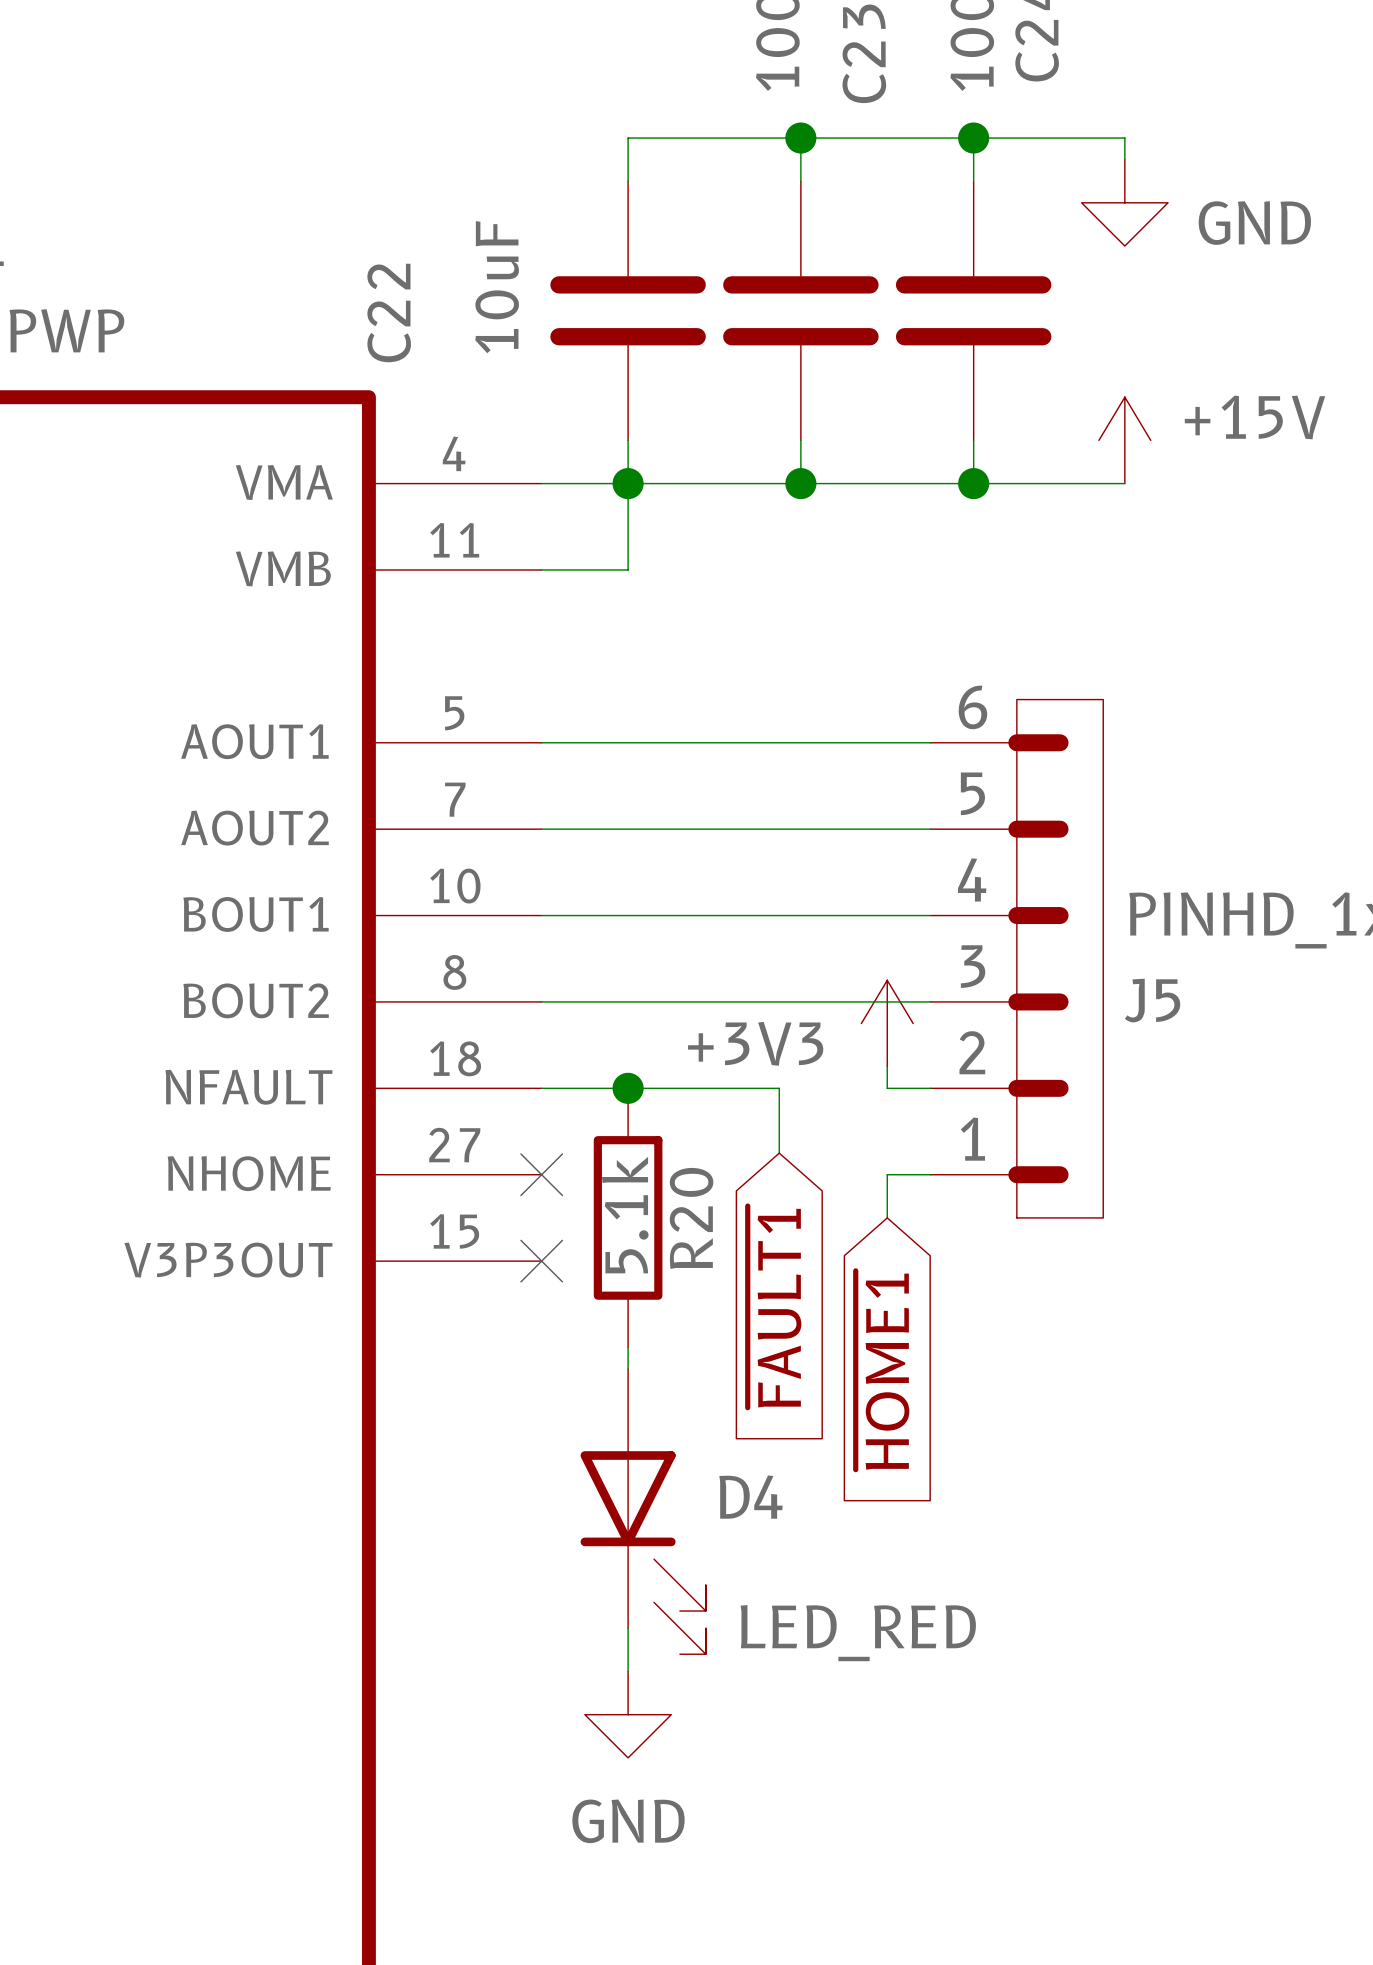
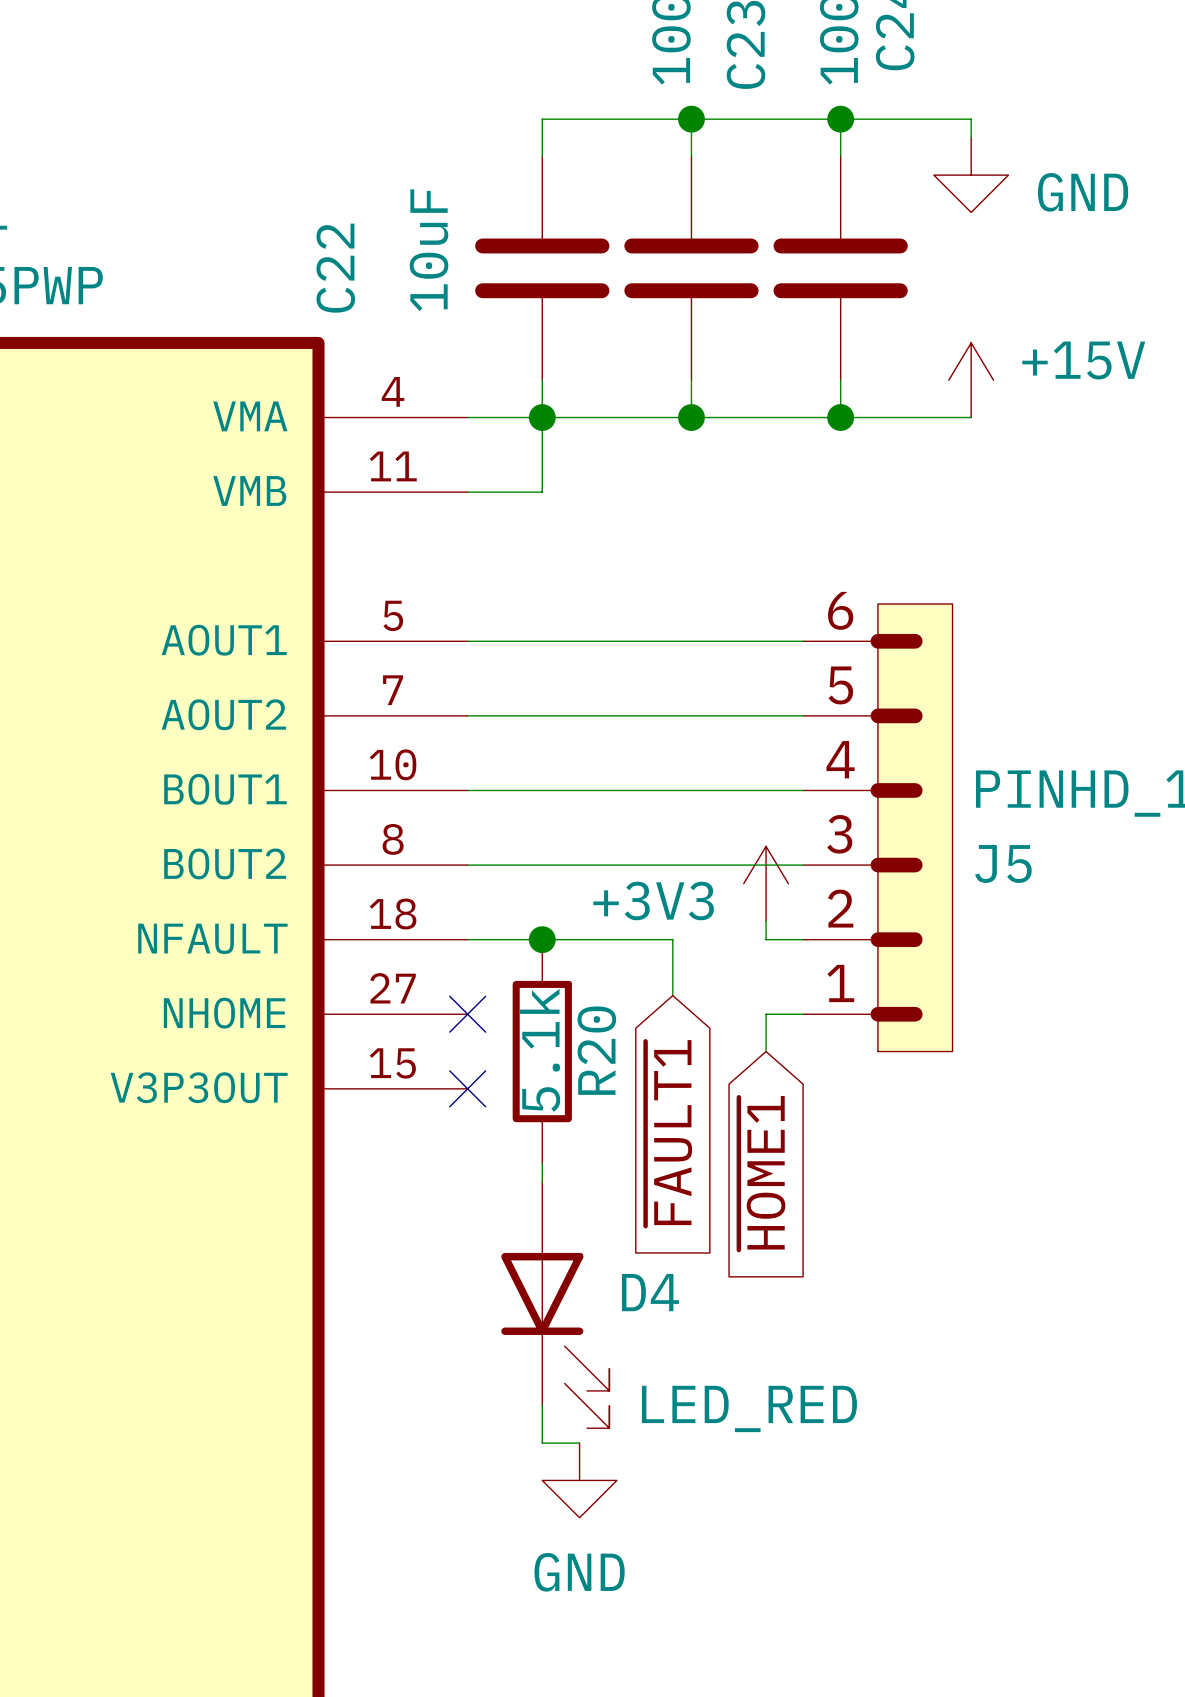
wire: none -> (542, 1443) (579, 1443)
power symbol position: GND (628, 1714) -> GND (579, 1480)

